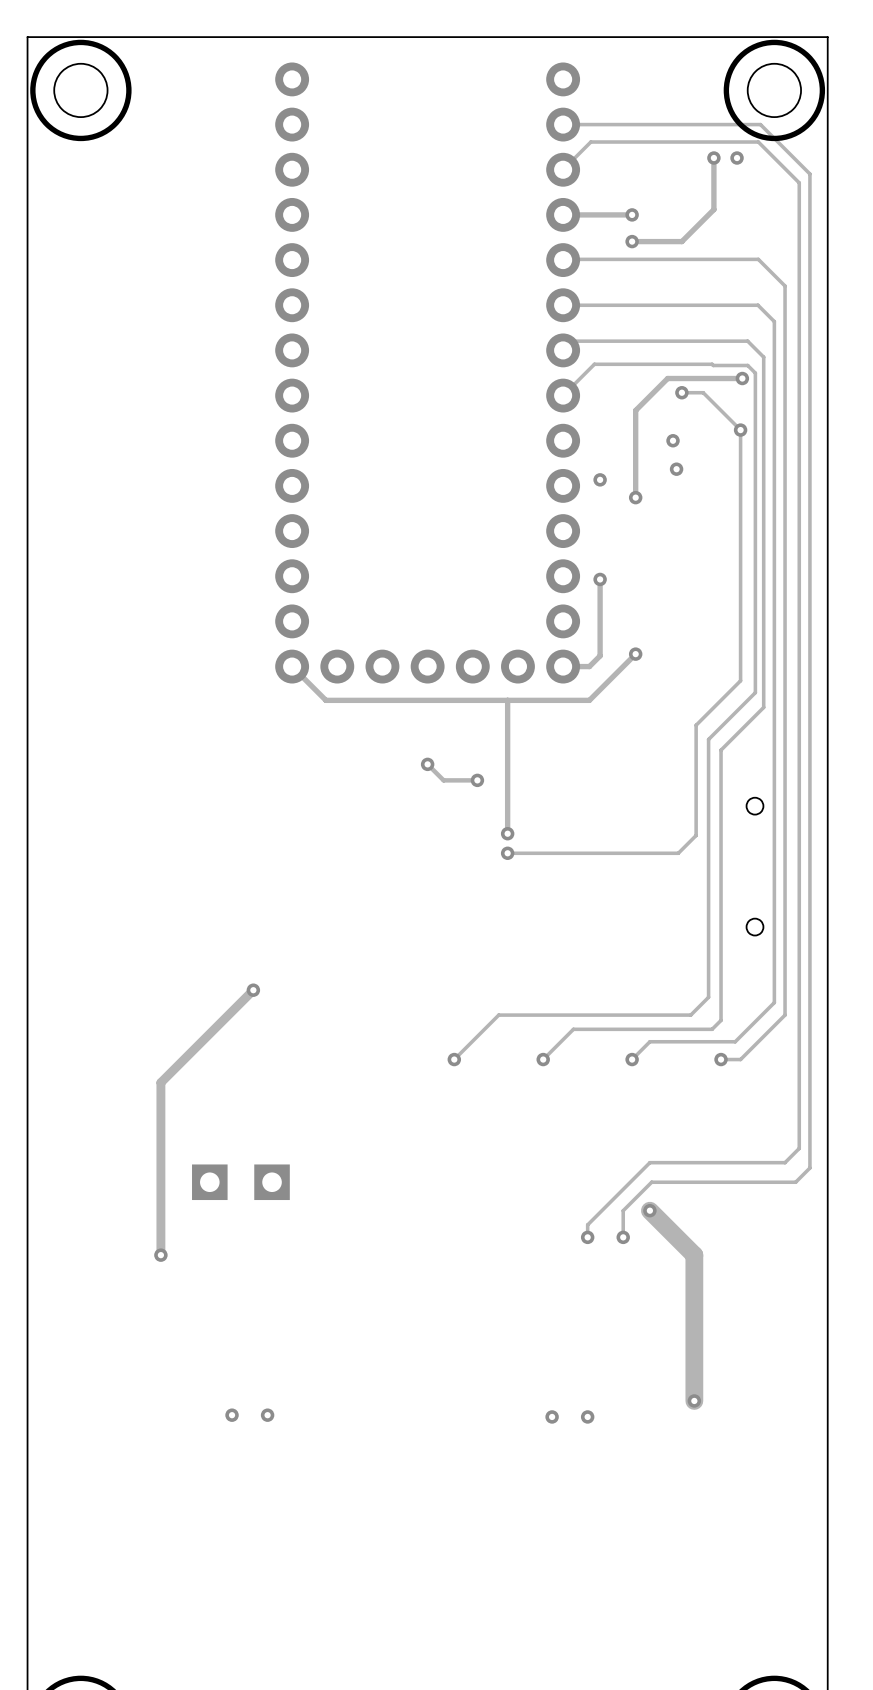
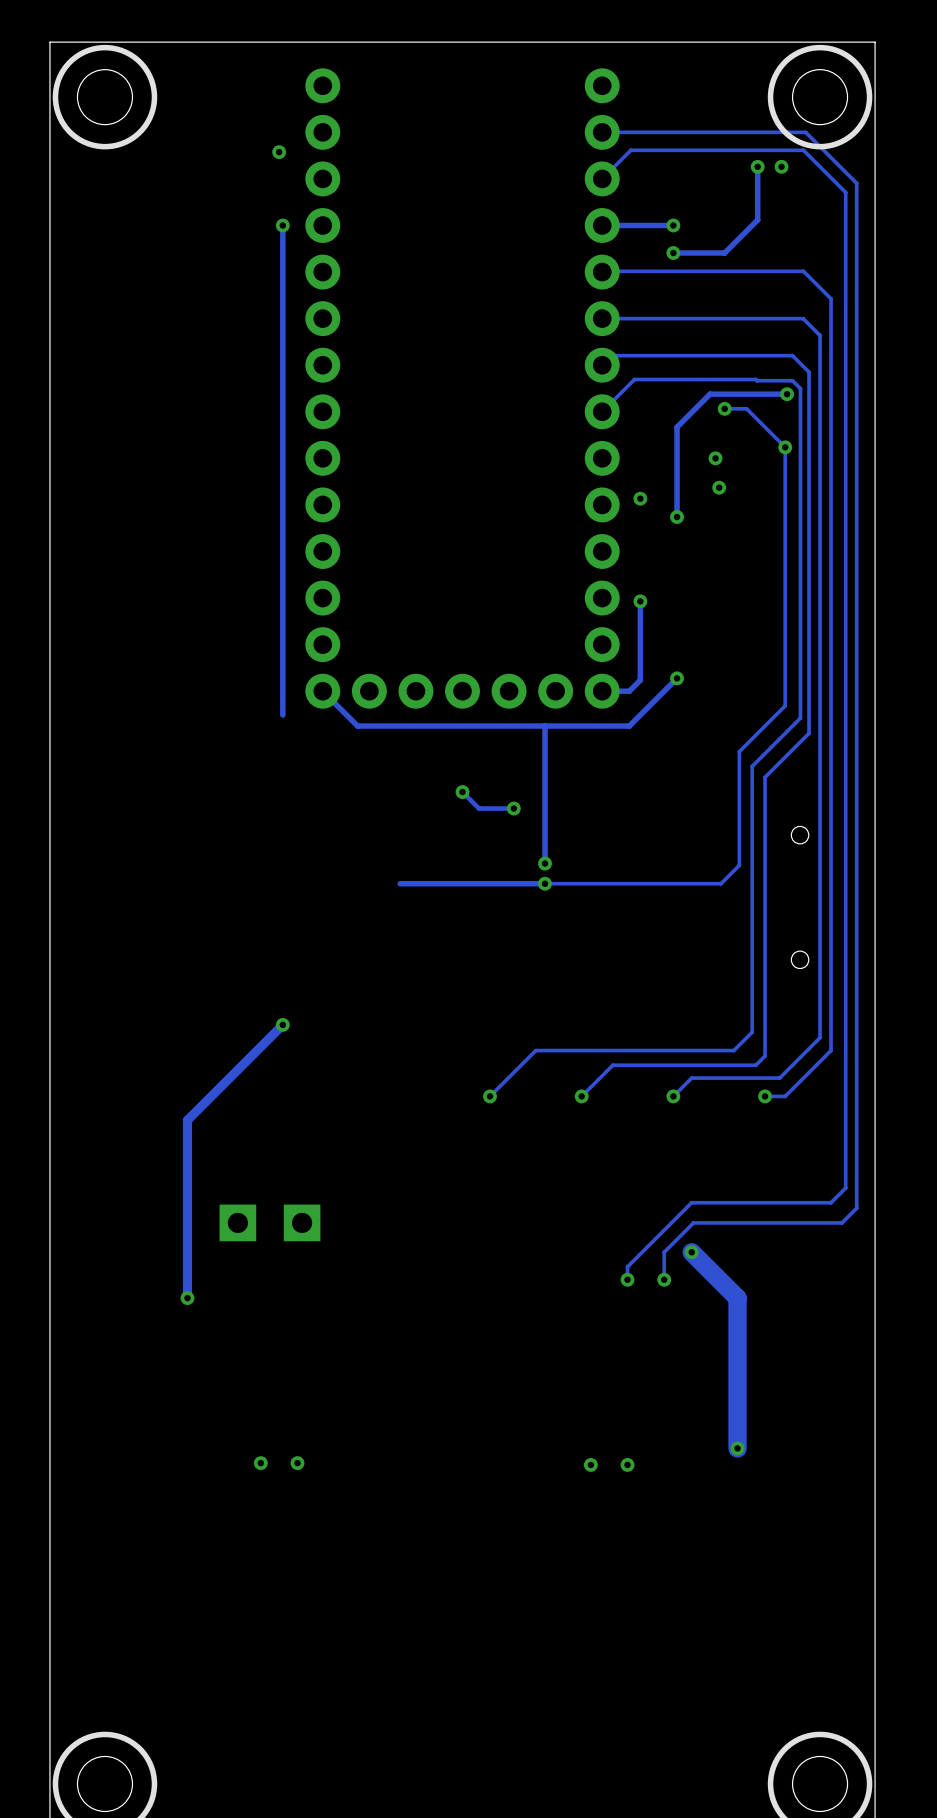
via: none -> (279, 152)
track: none -> (282, 225) (282, 715)
via: none -> (282, 225)
track: none -> (545, 883) (400, 883)

